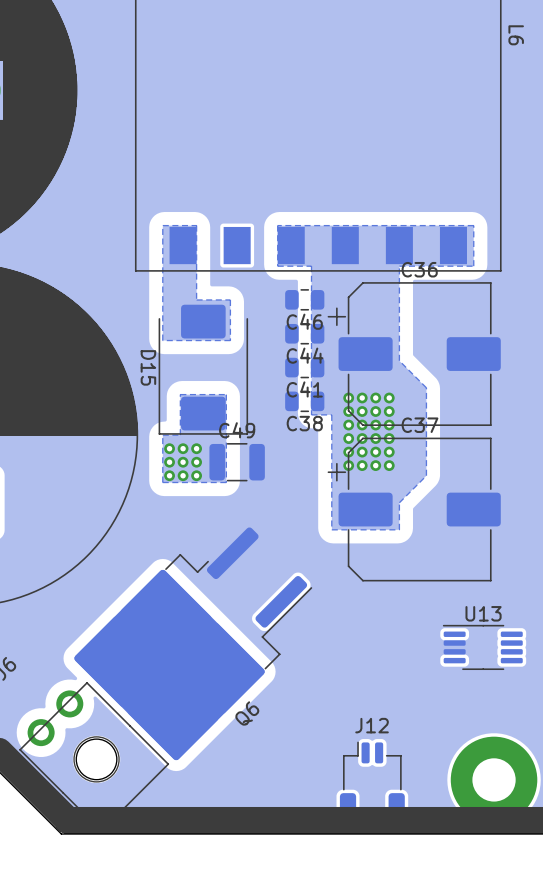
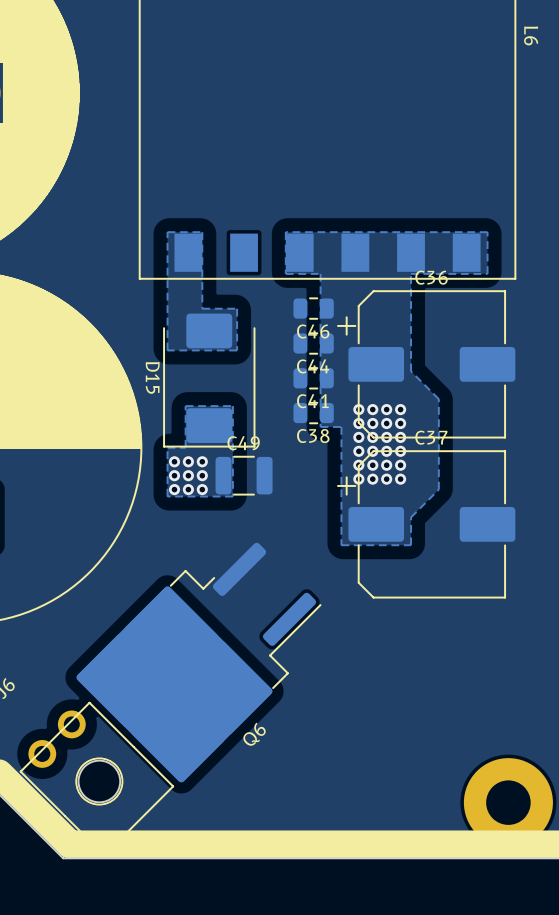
U13: (482, 647) -> none
J12: (372, 779) -> none

